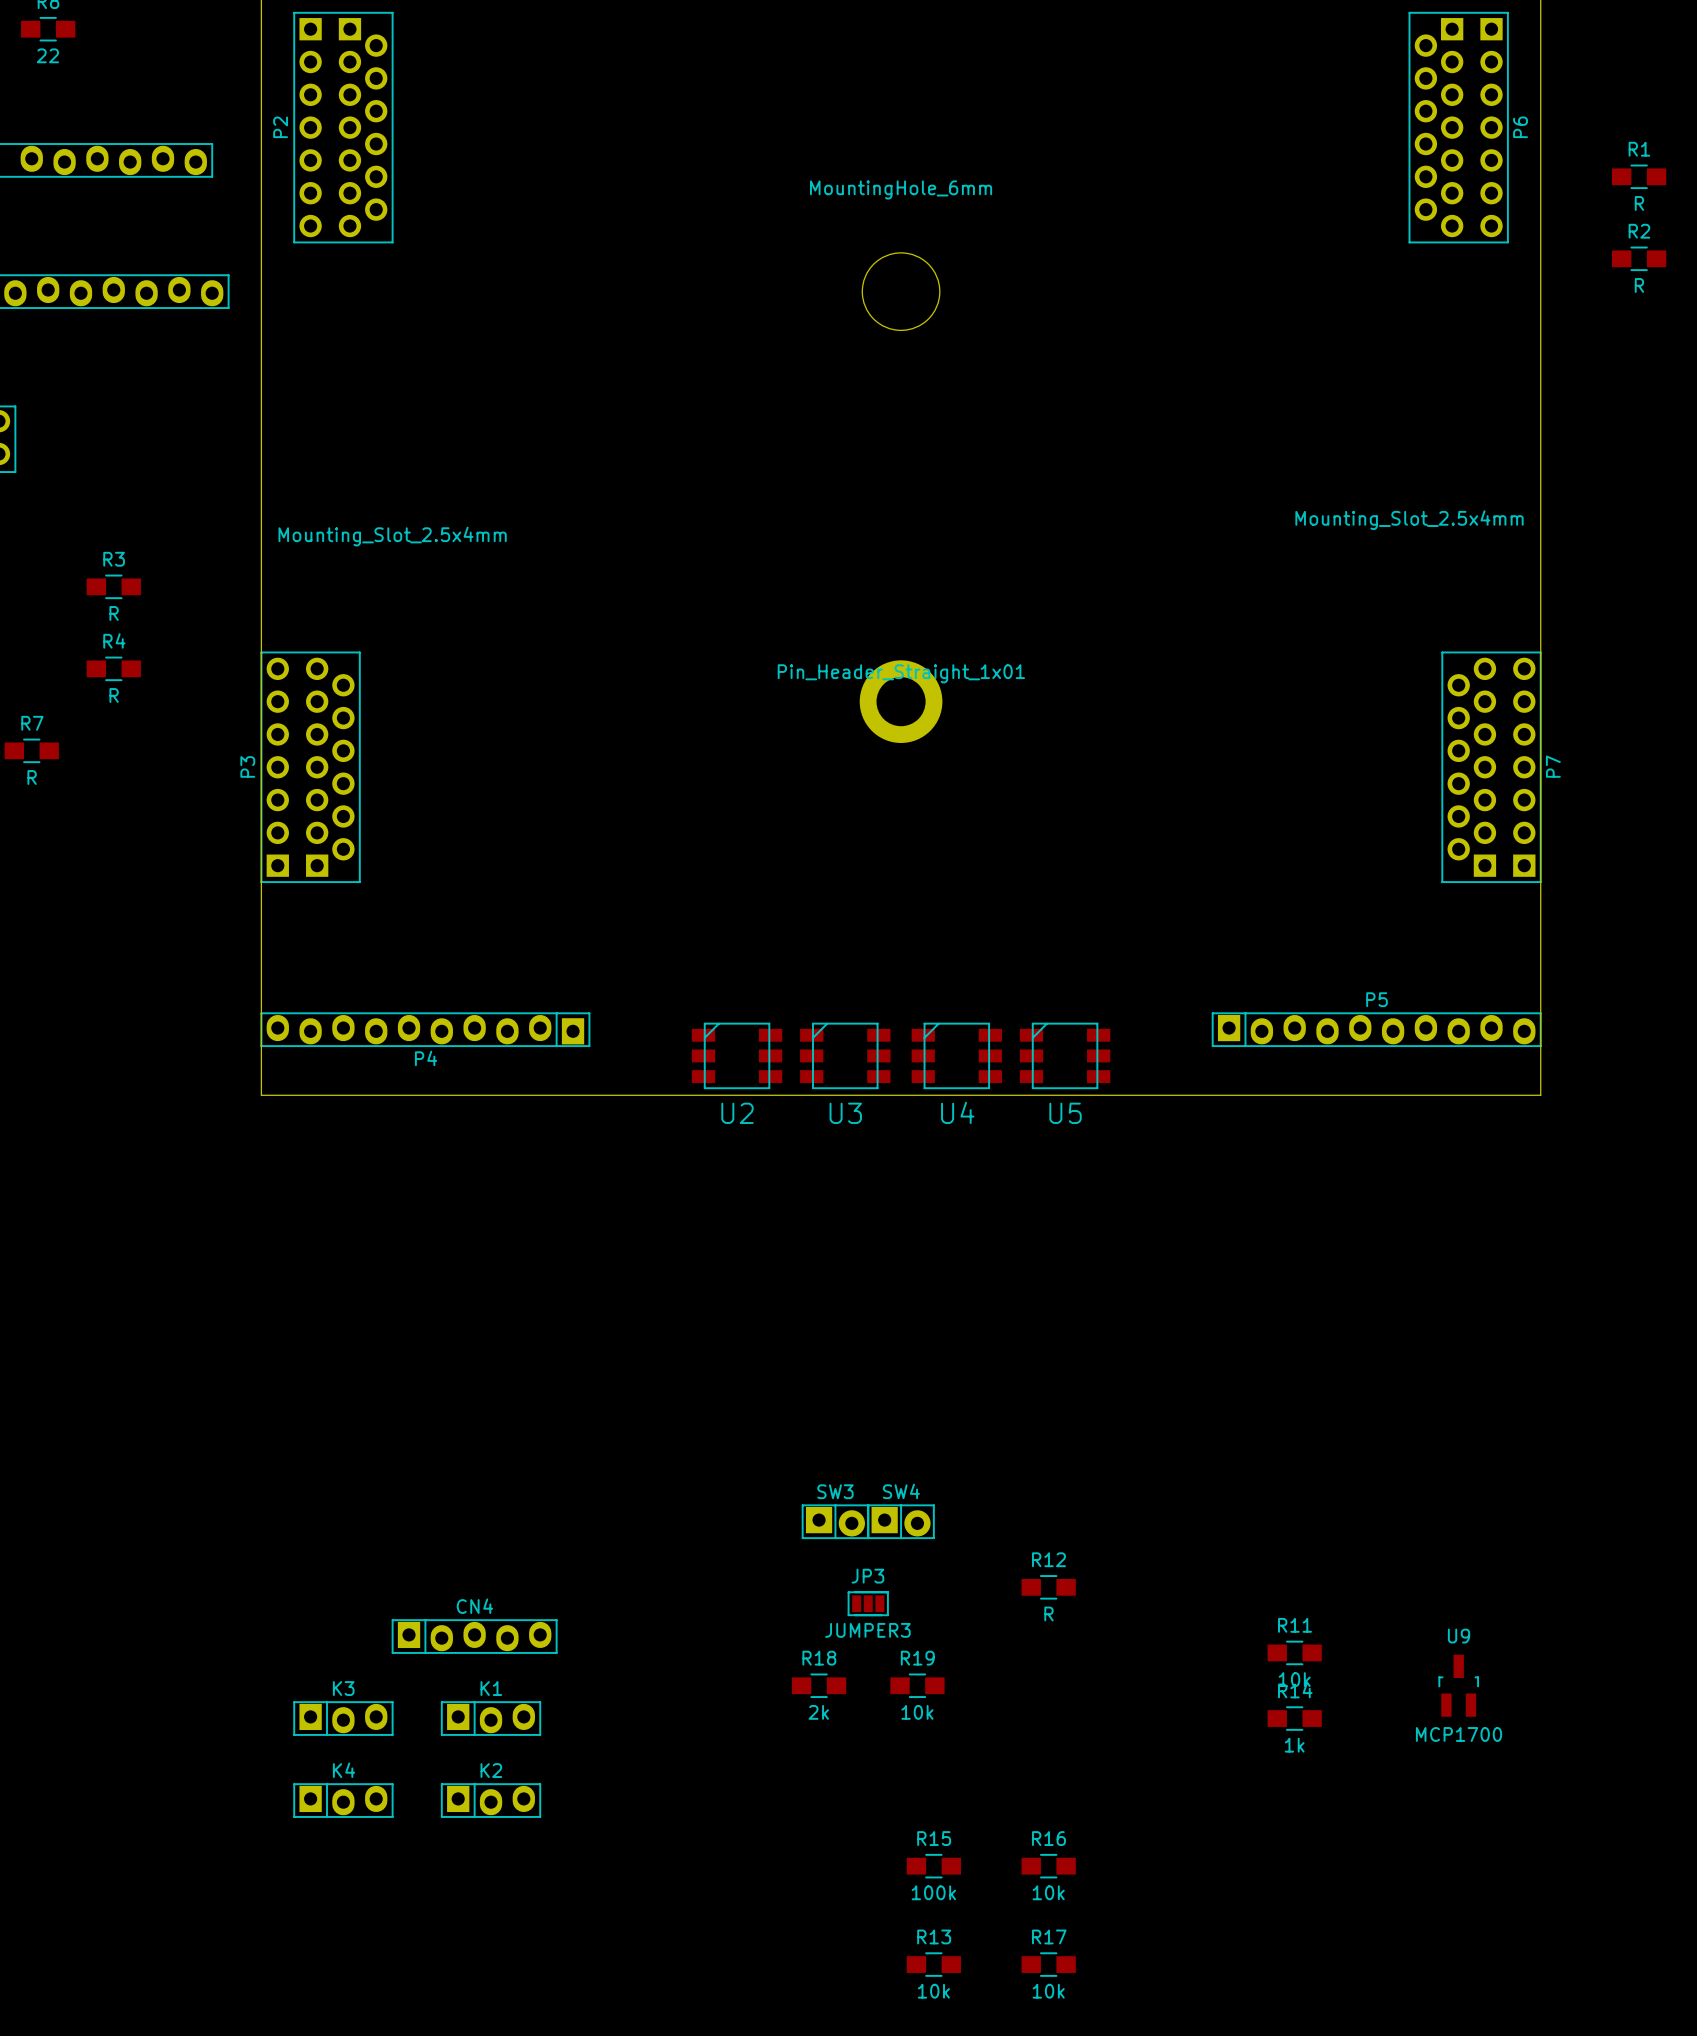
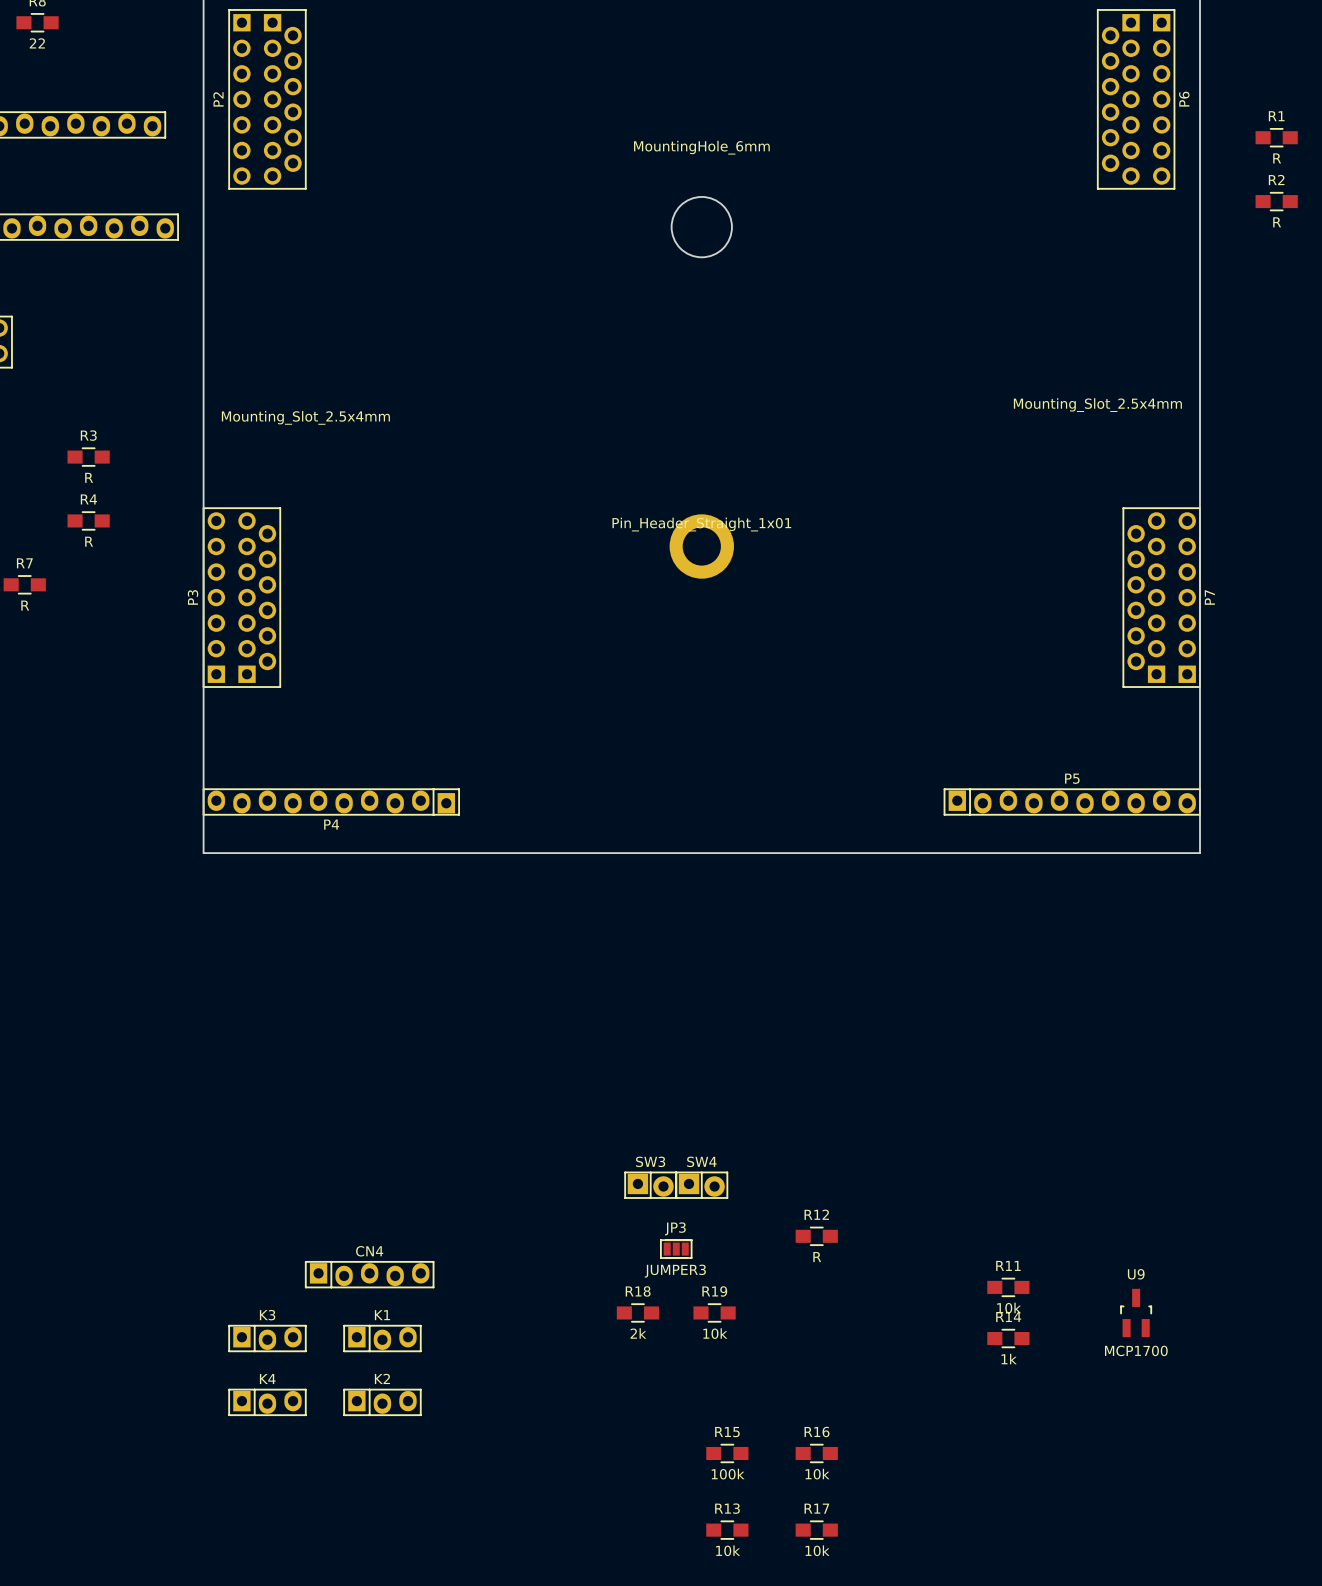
U2: (737, 1055) -> none
U3: (845, 1055) -> none
U4: (956, 1055) -> none
U5: (1065, 1055) -> none

